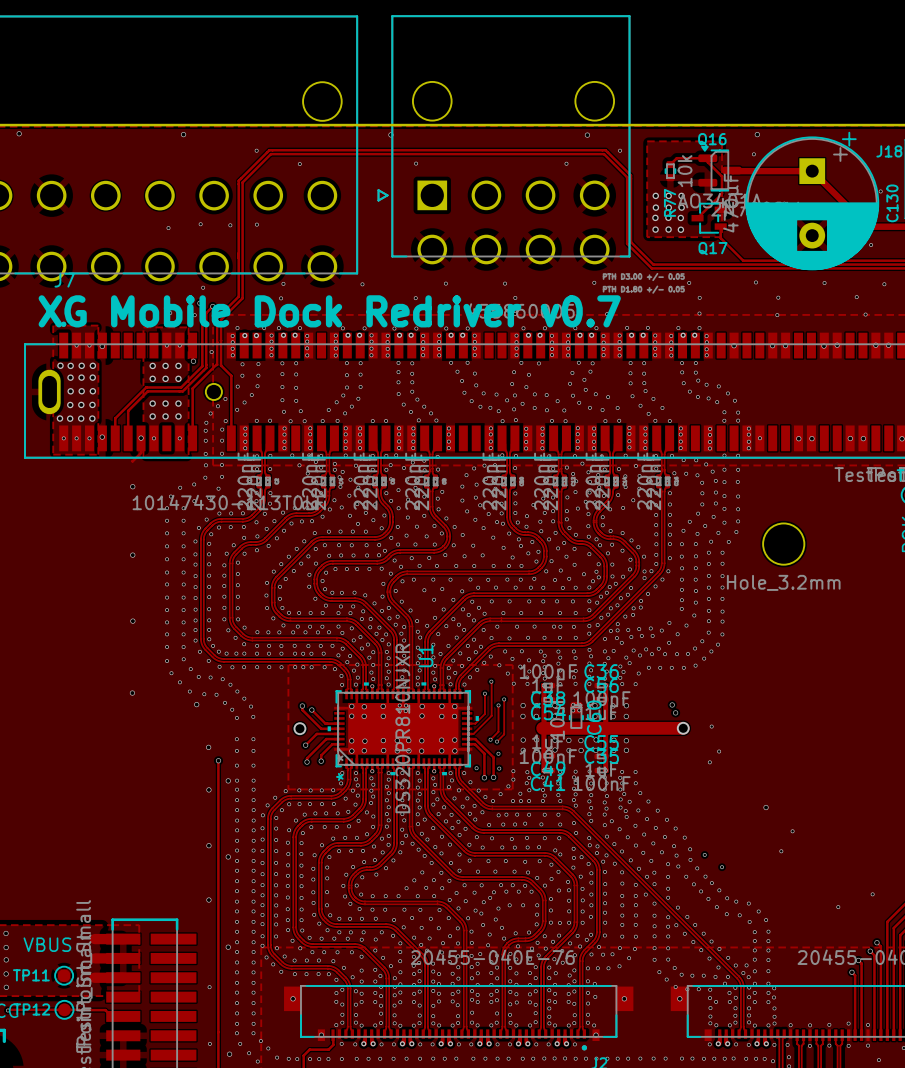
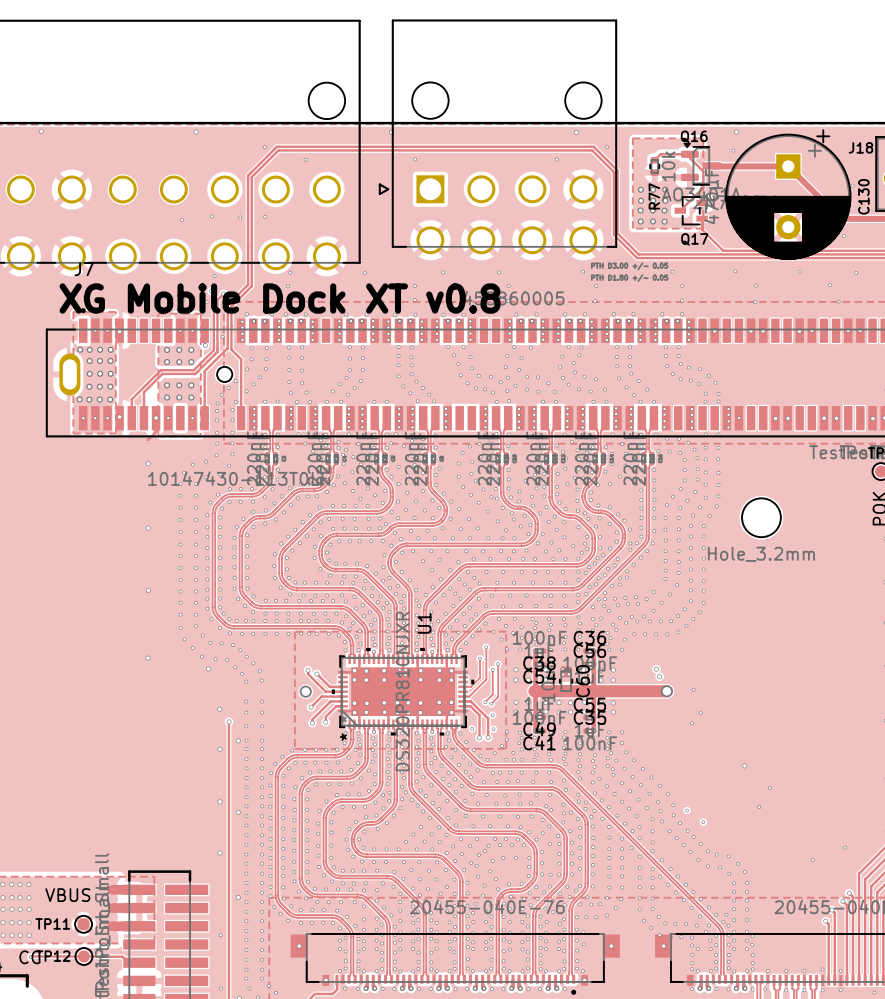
text: XG Mobile Dock Redriver v0.7 (329, 311) -> XG Mobile Dock XT v0.8 (280, 298)

